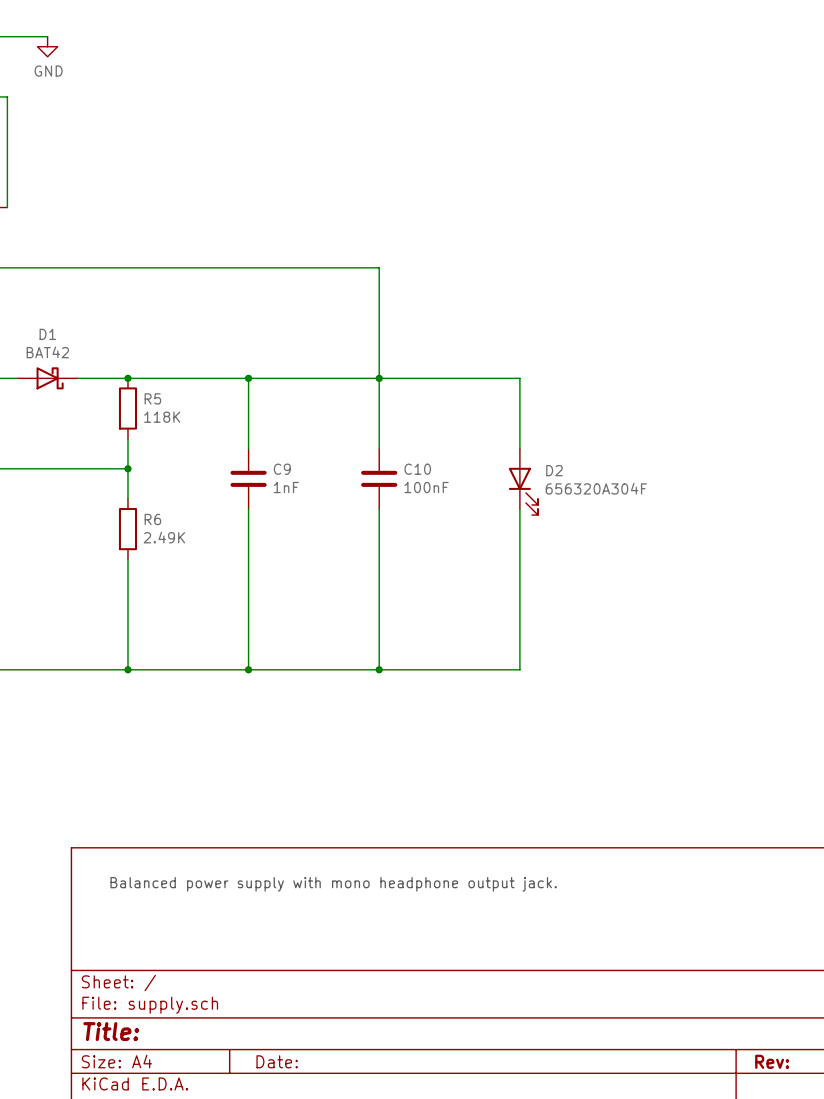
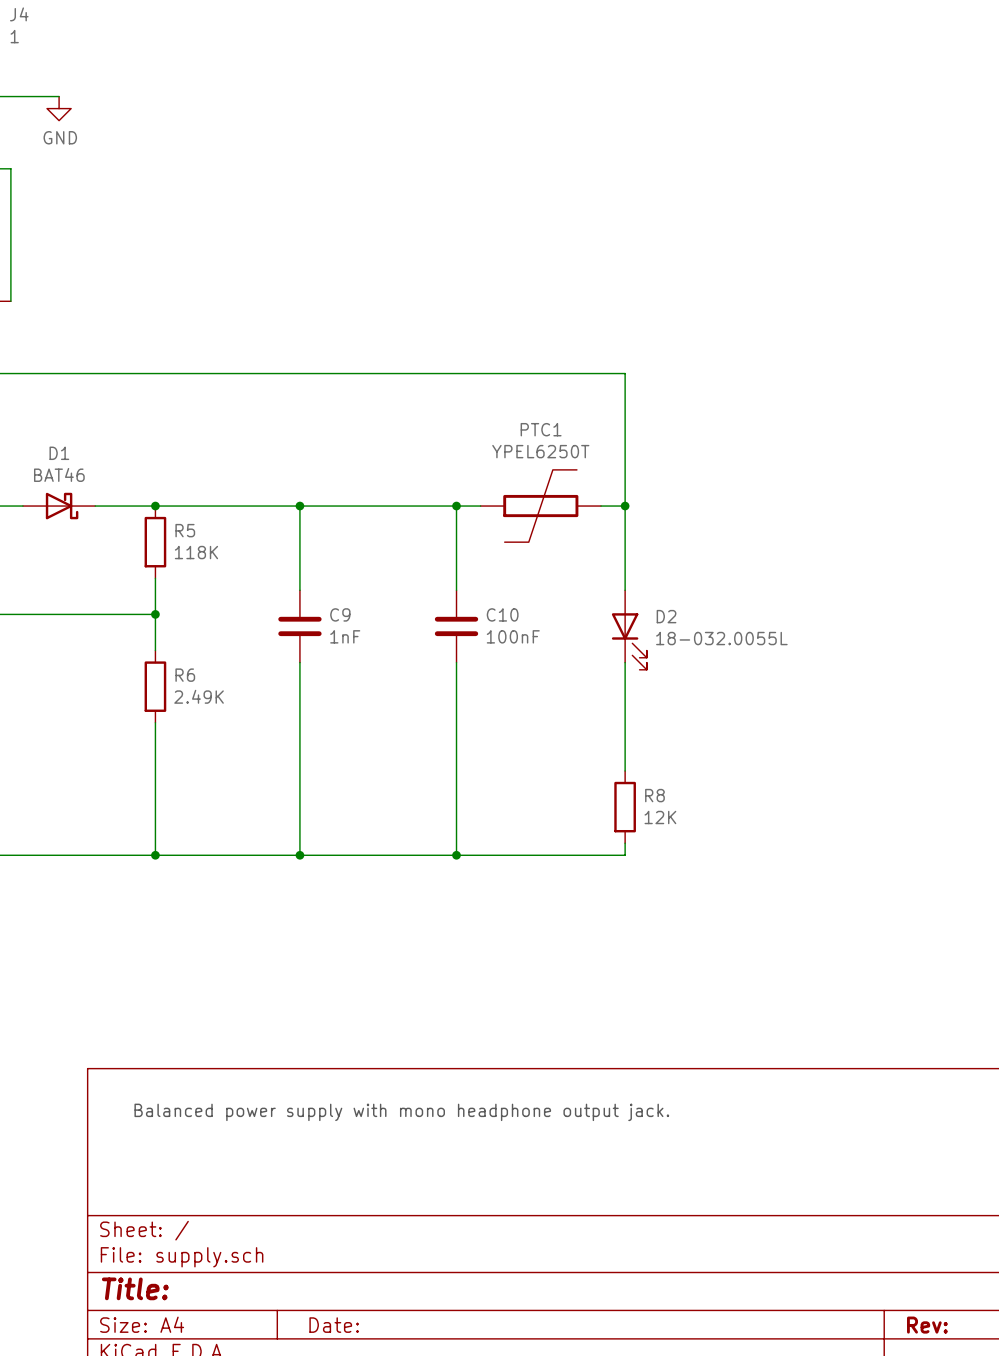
wire: (379, 267) (379, 378) -> (456, 373) (625, 373) (625, 506)
D1 value: BAT42 (47, 352) -> BAT46 (59, 474)
wire: (399, 378) (499, 378) -> none
PTC1: none -> YPEL6250T (540, 506)
junction: none -> (625, 506)
D2 value: 656320A304F (596, 488) -> 18-032.0055L (721, 638)
wire: (519, 599) (519, 659) -> none
R8: none -> 12K (625, 807)

